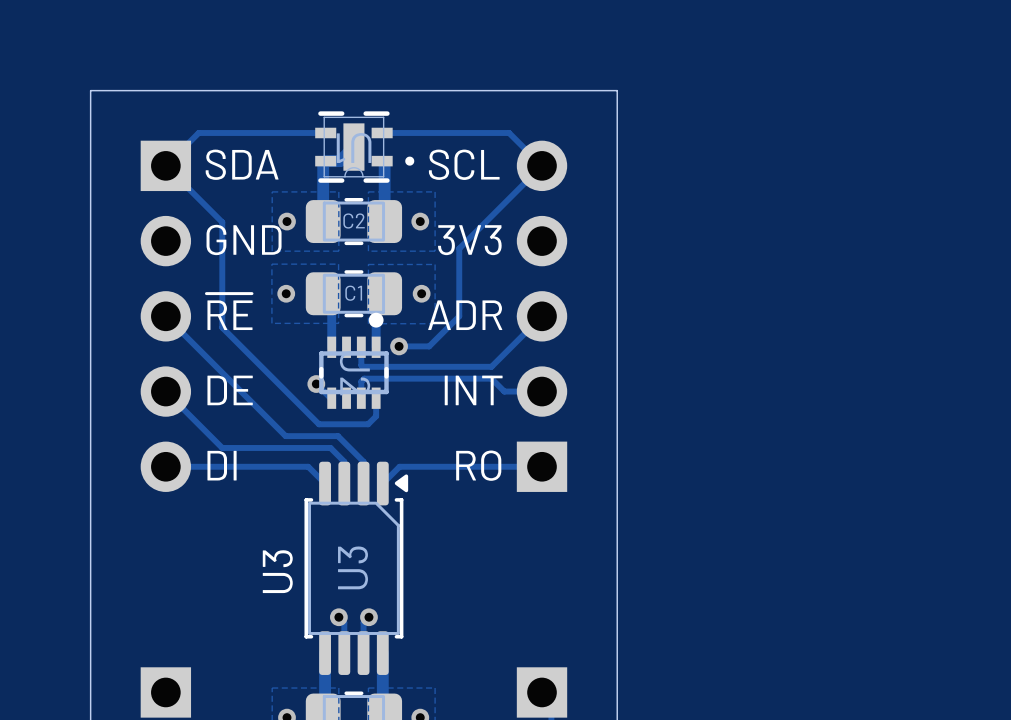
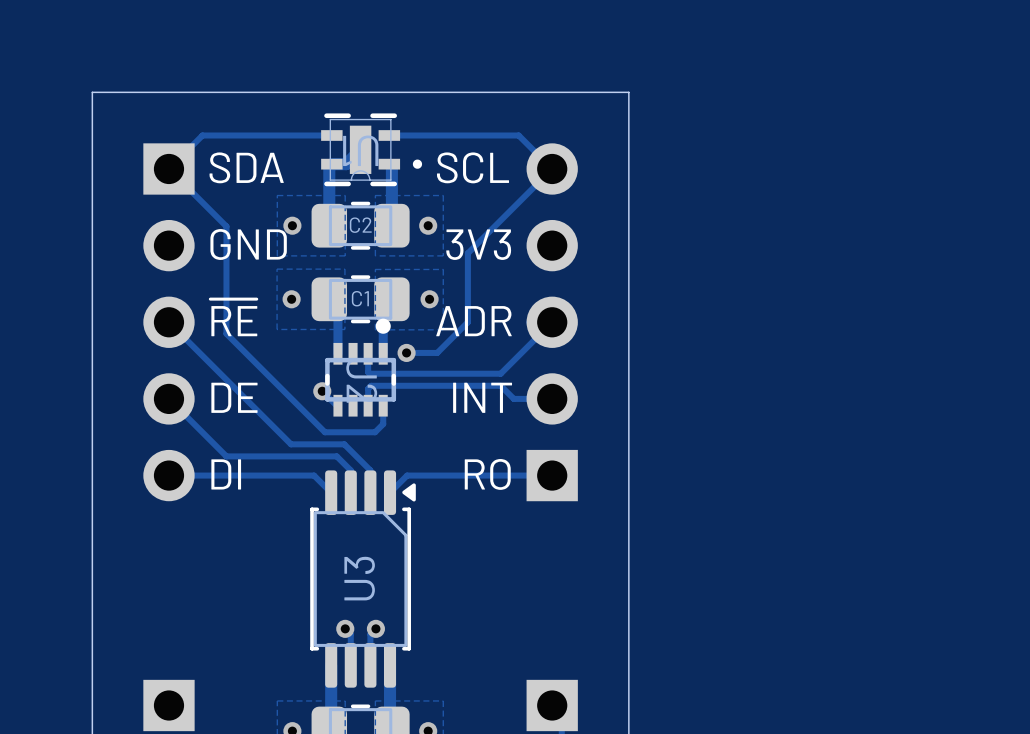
text: U3 (277, 571) -> none

